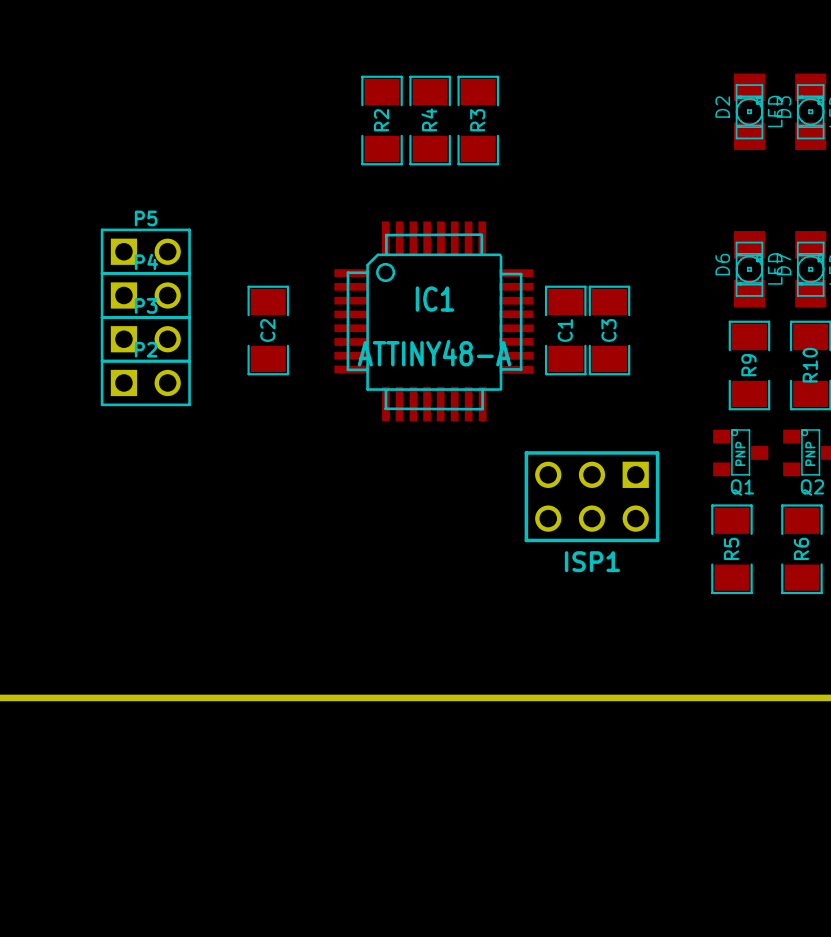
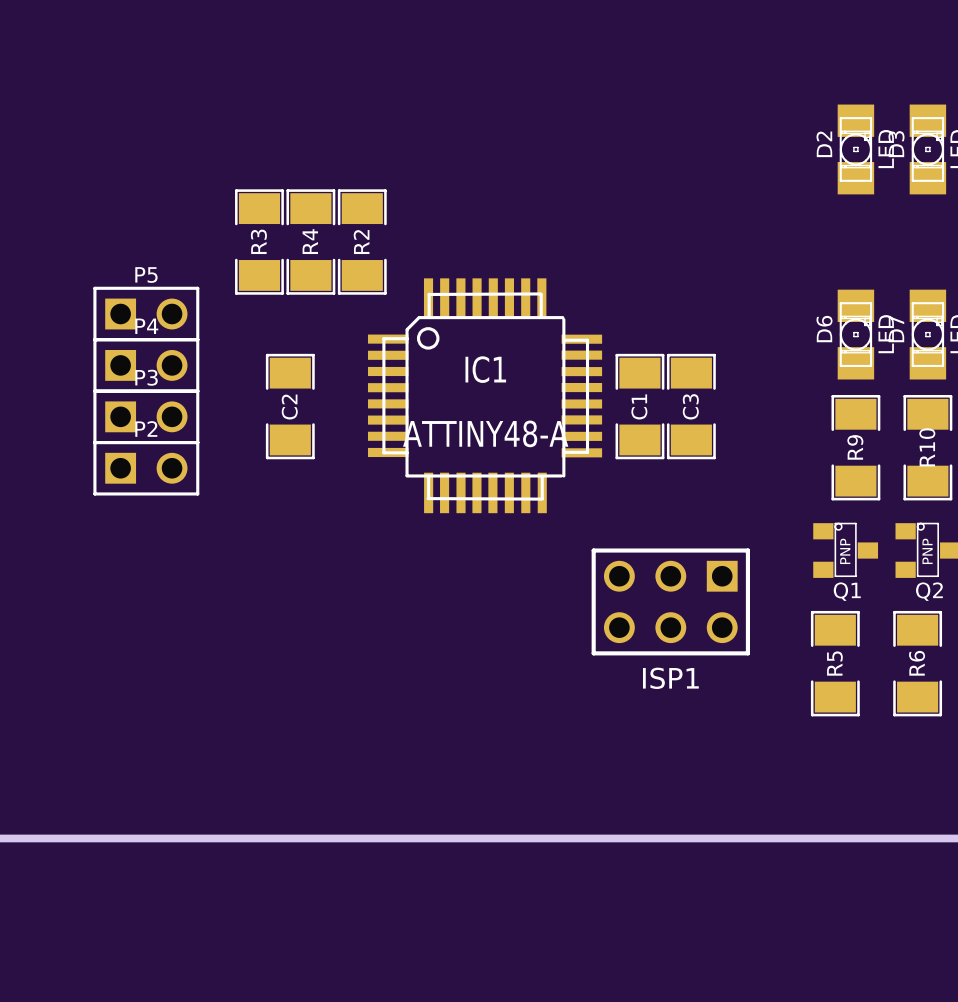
R2 position: (382, 120) -> (362, 242)
R4 position: (430, 120) -> (310, 242)
R3 position: (478, 120) -> (259, 242)

